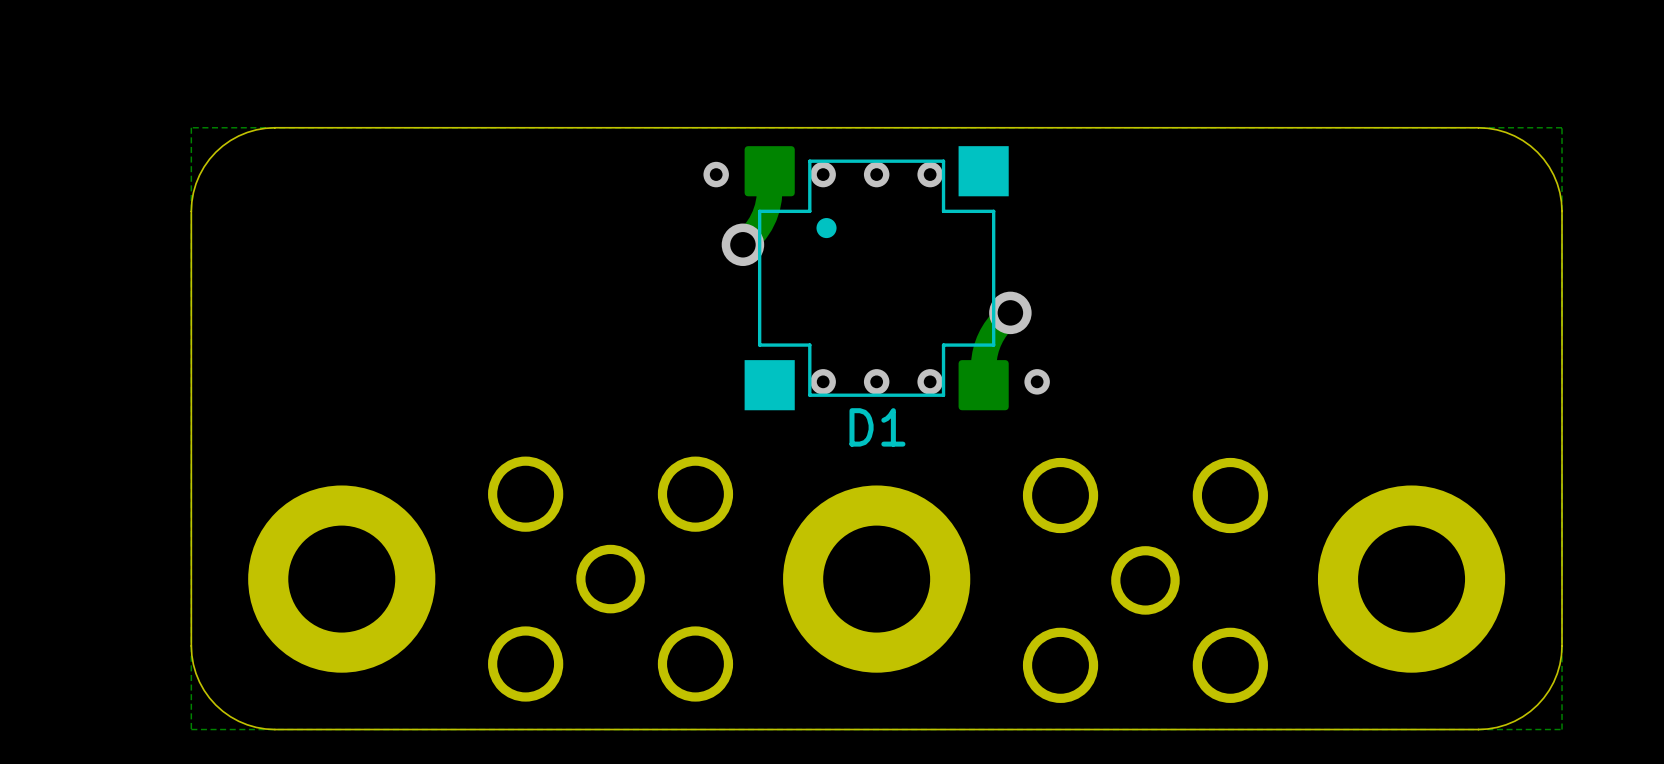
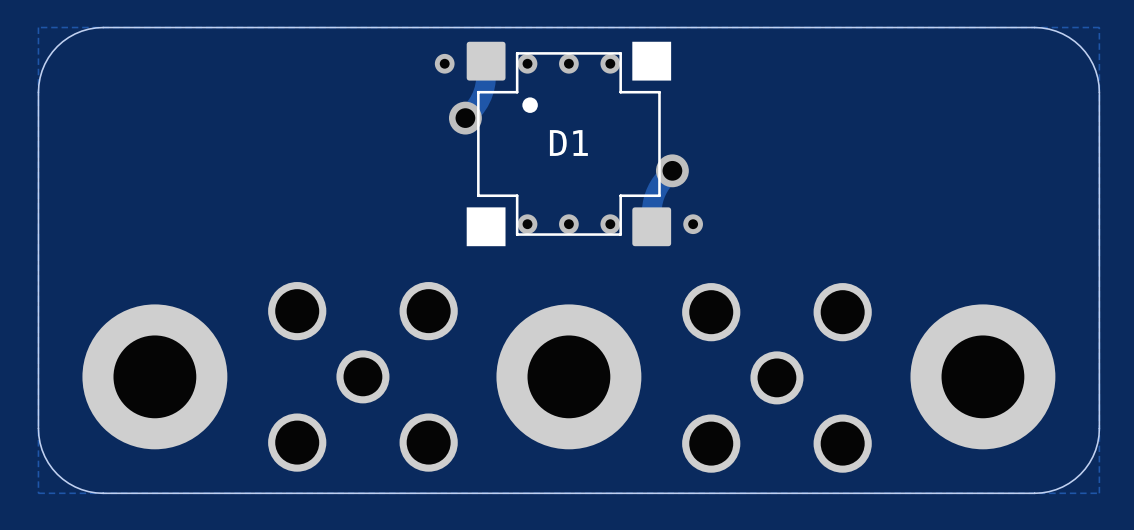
D1 name position: D1 (877, 427) -> D1 (568, 143)

